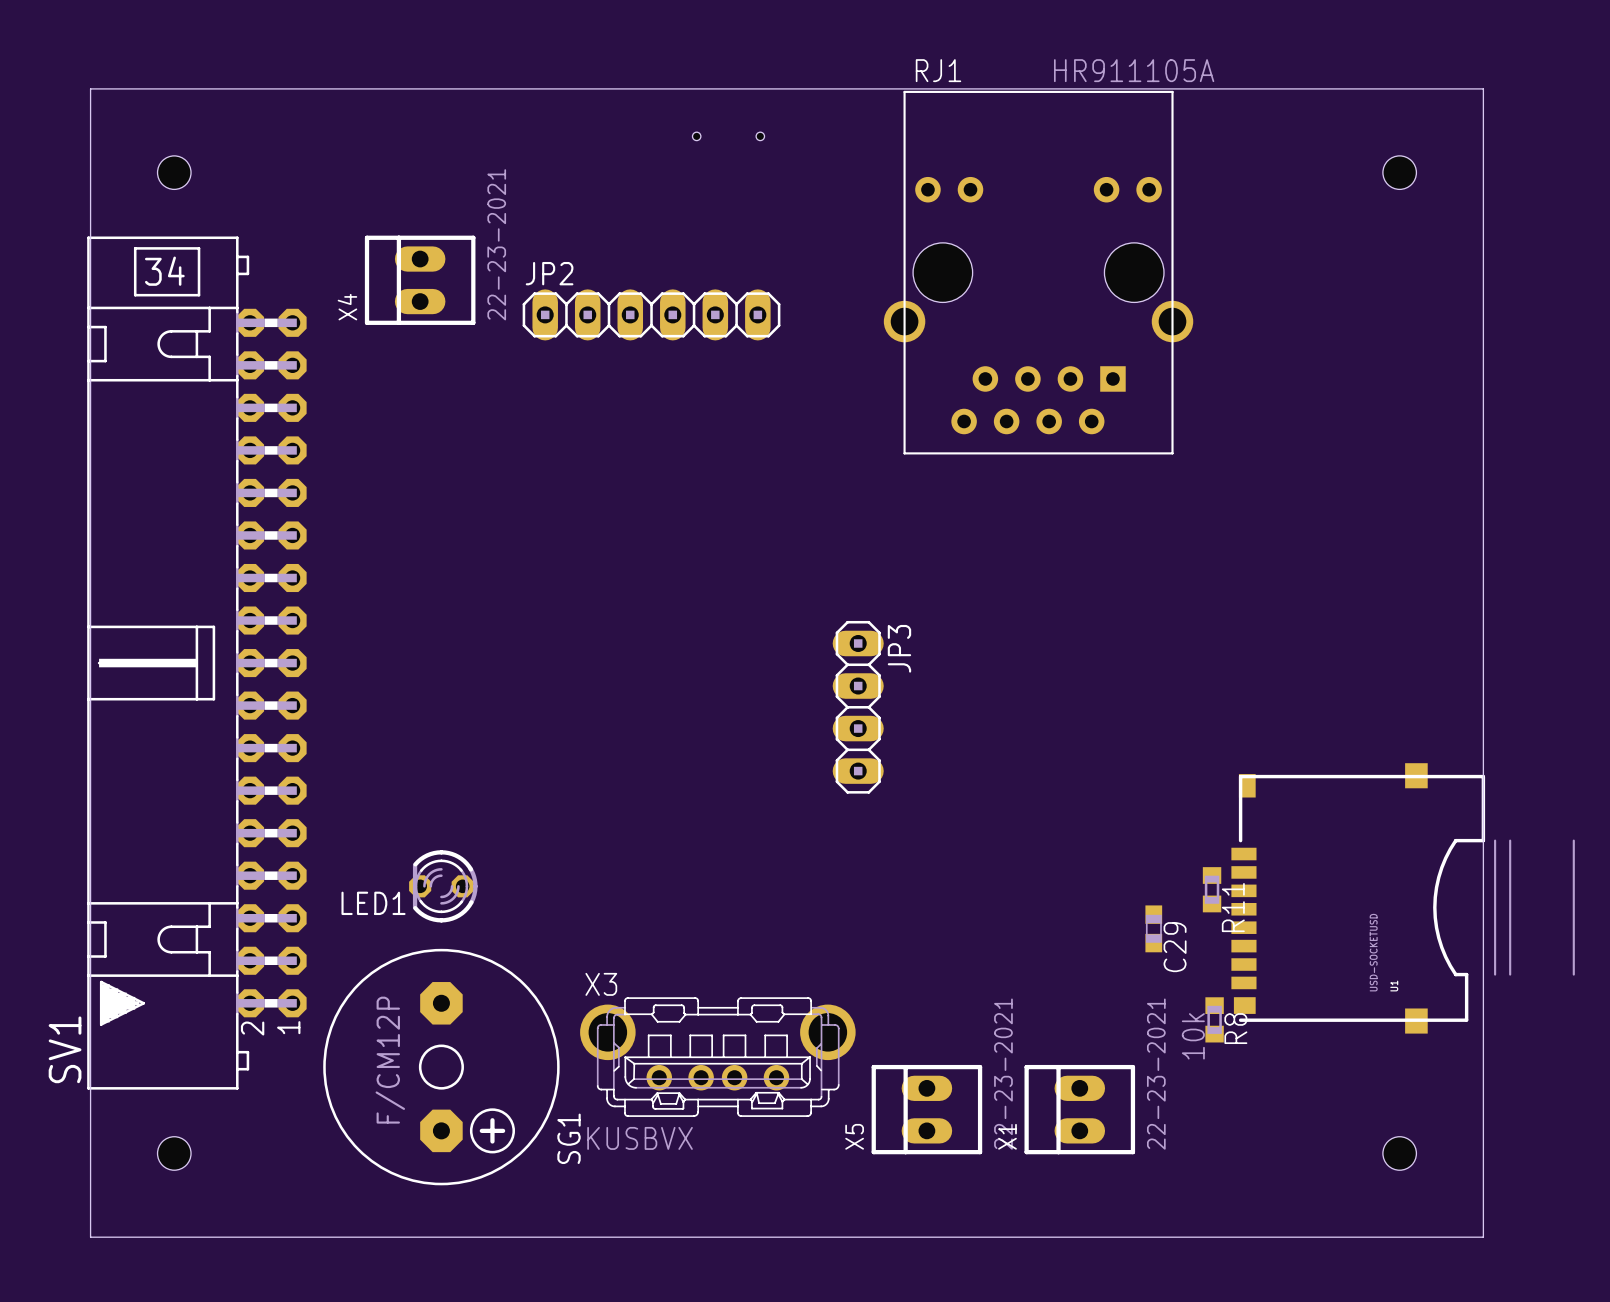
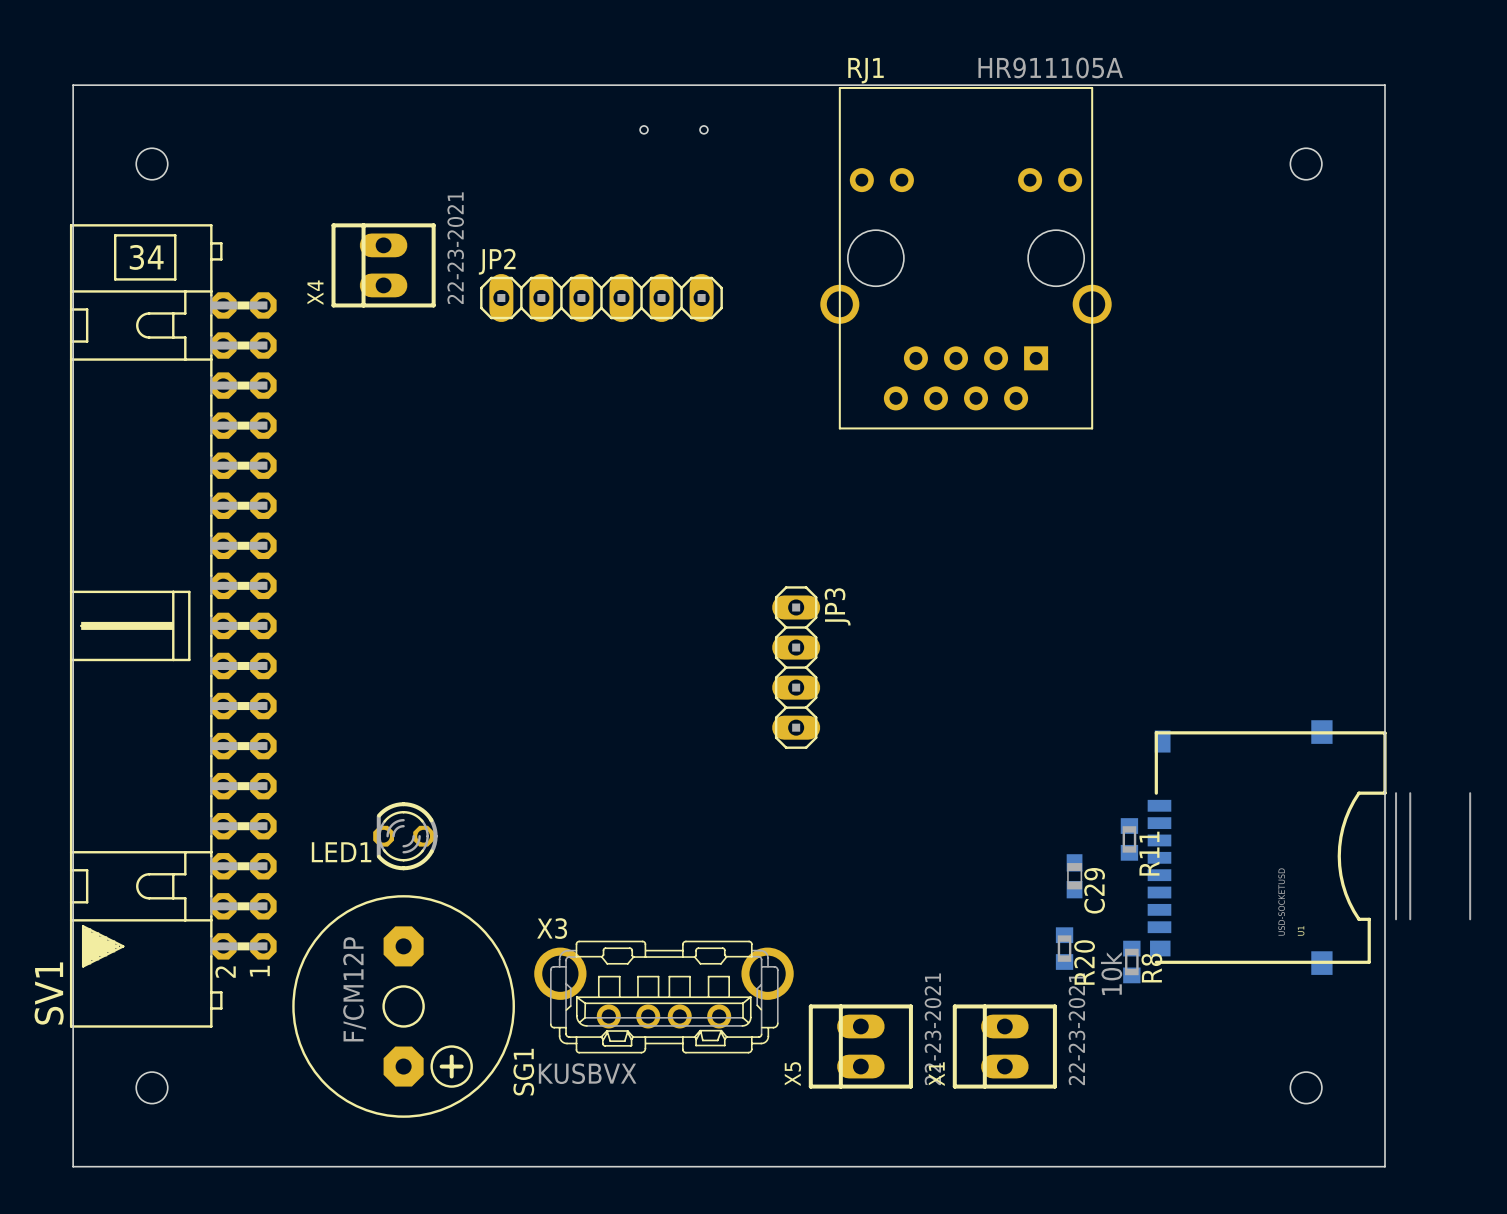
R20: none -> (1064, 948)

